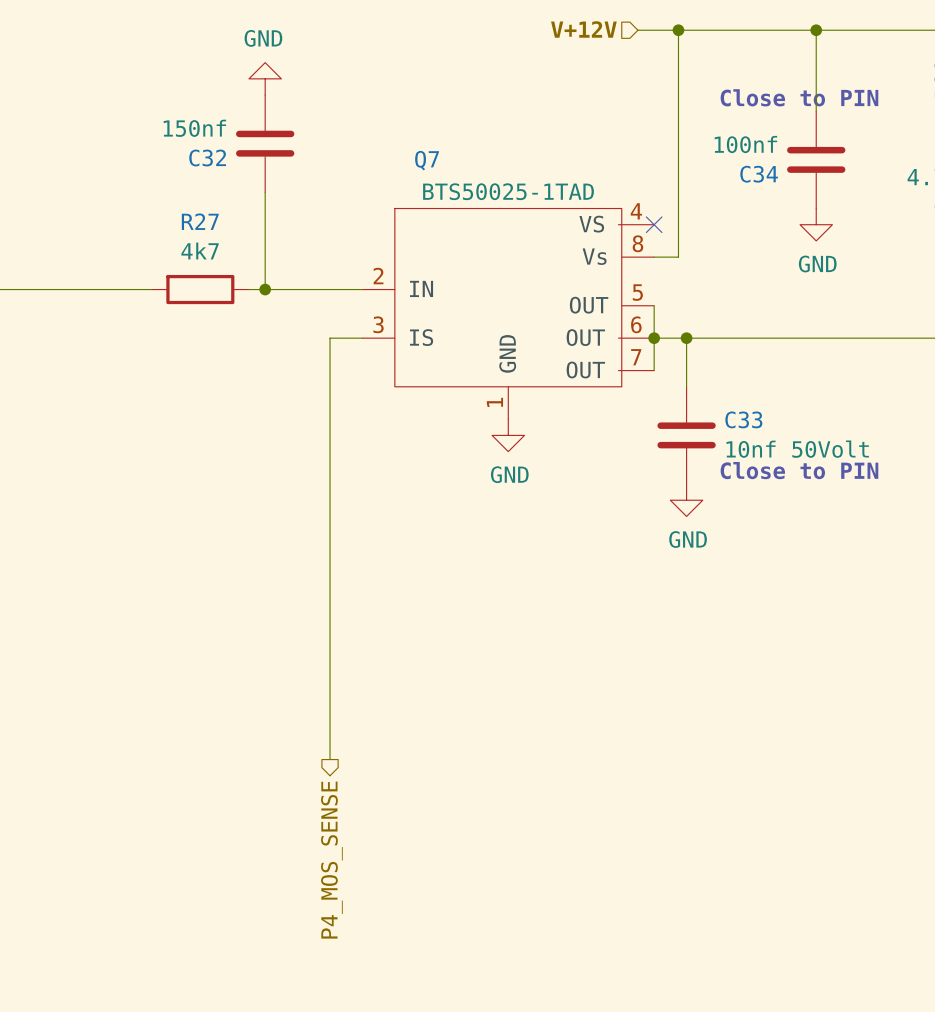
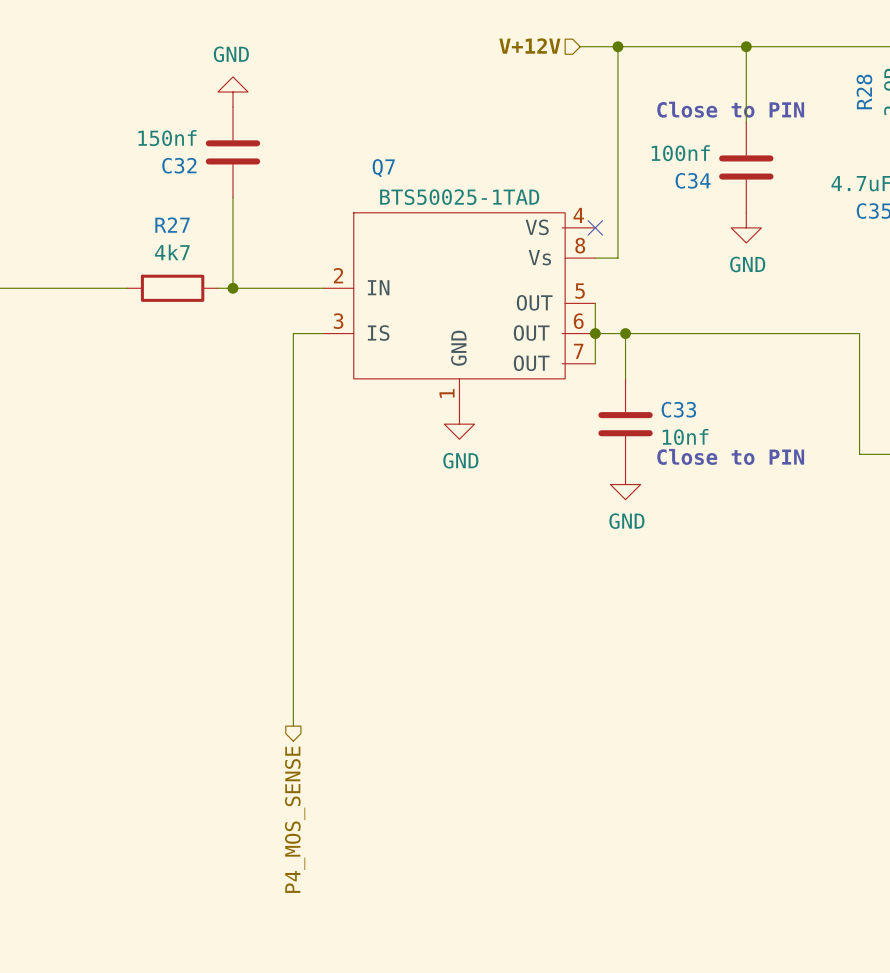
C33 value: 10nf 50Volt (797, 449) -> 10nf (685, 437)

